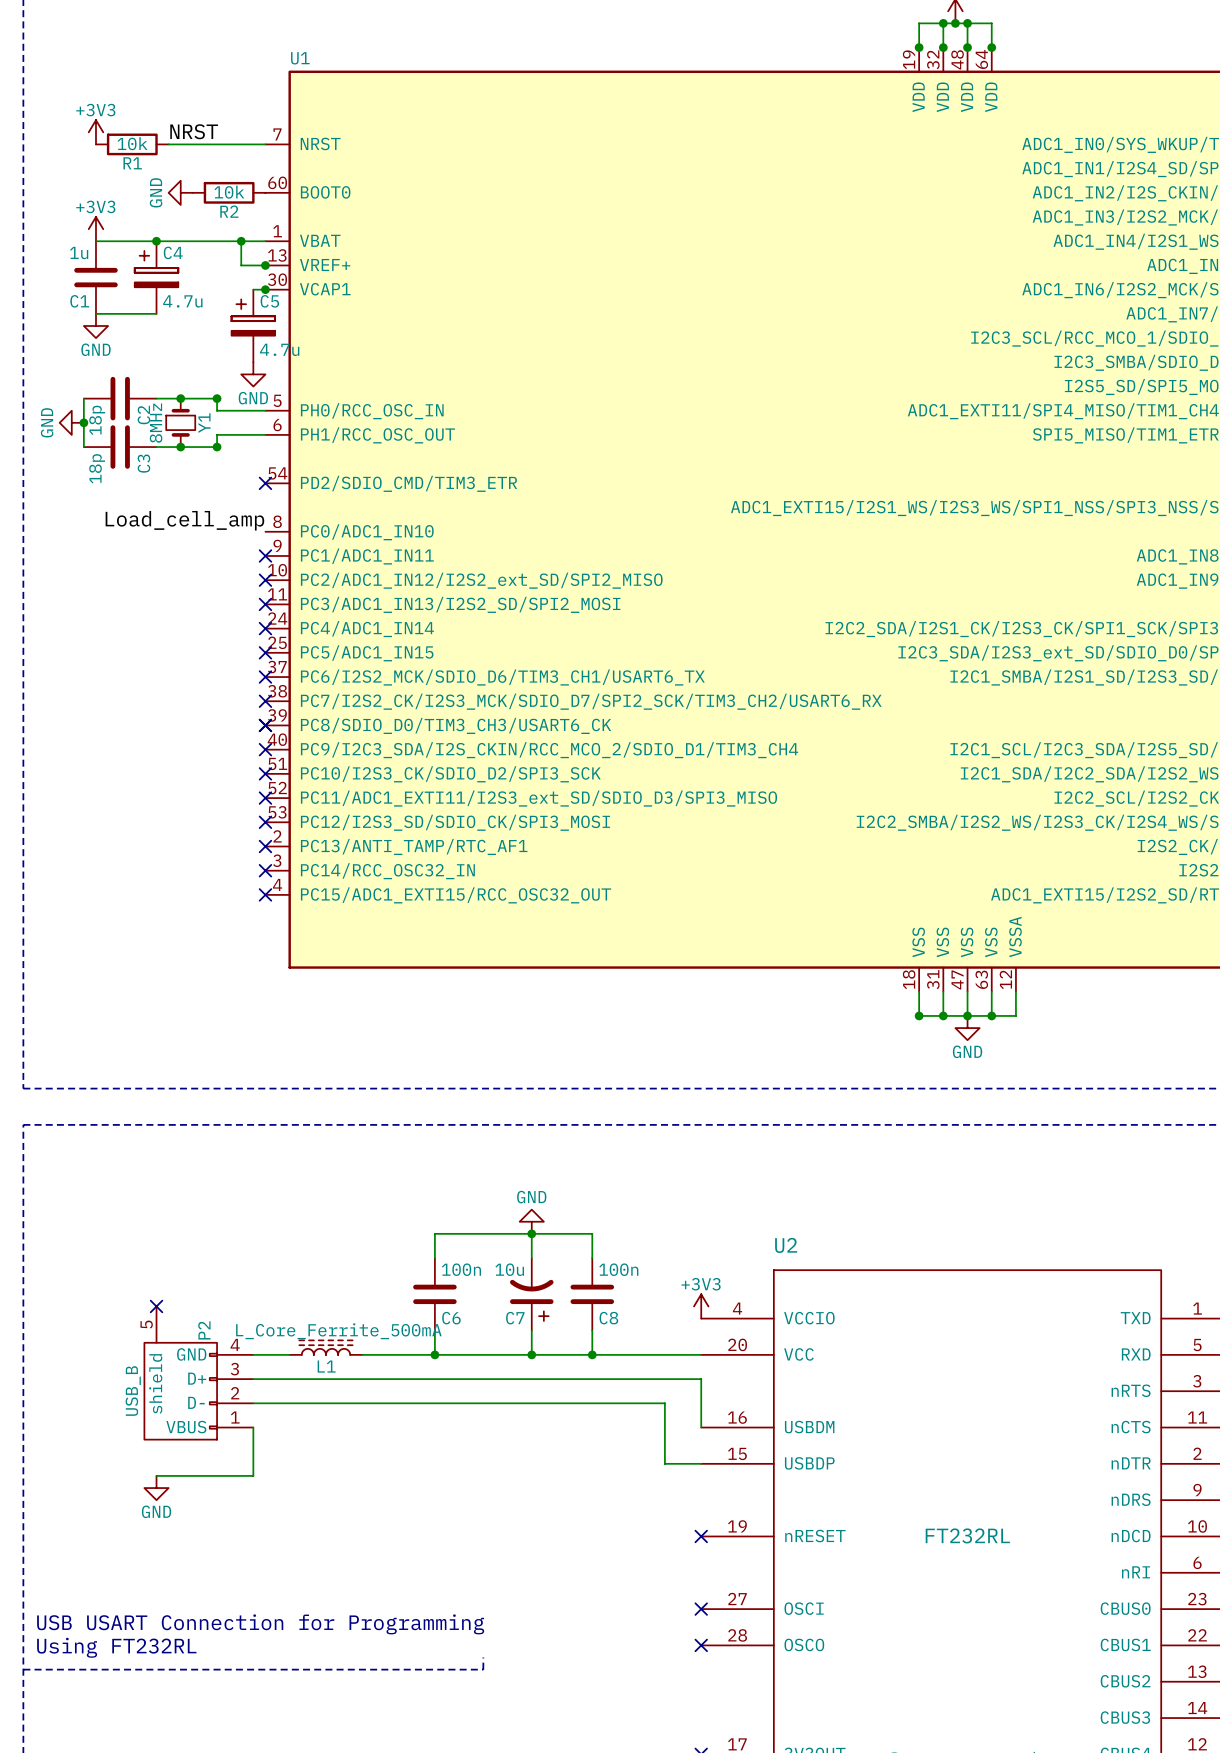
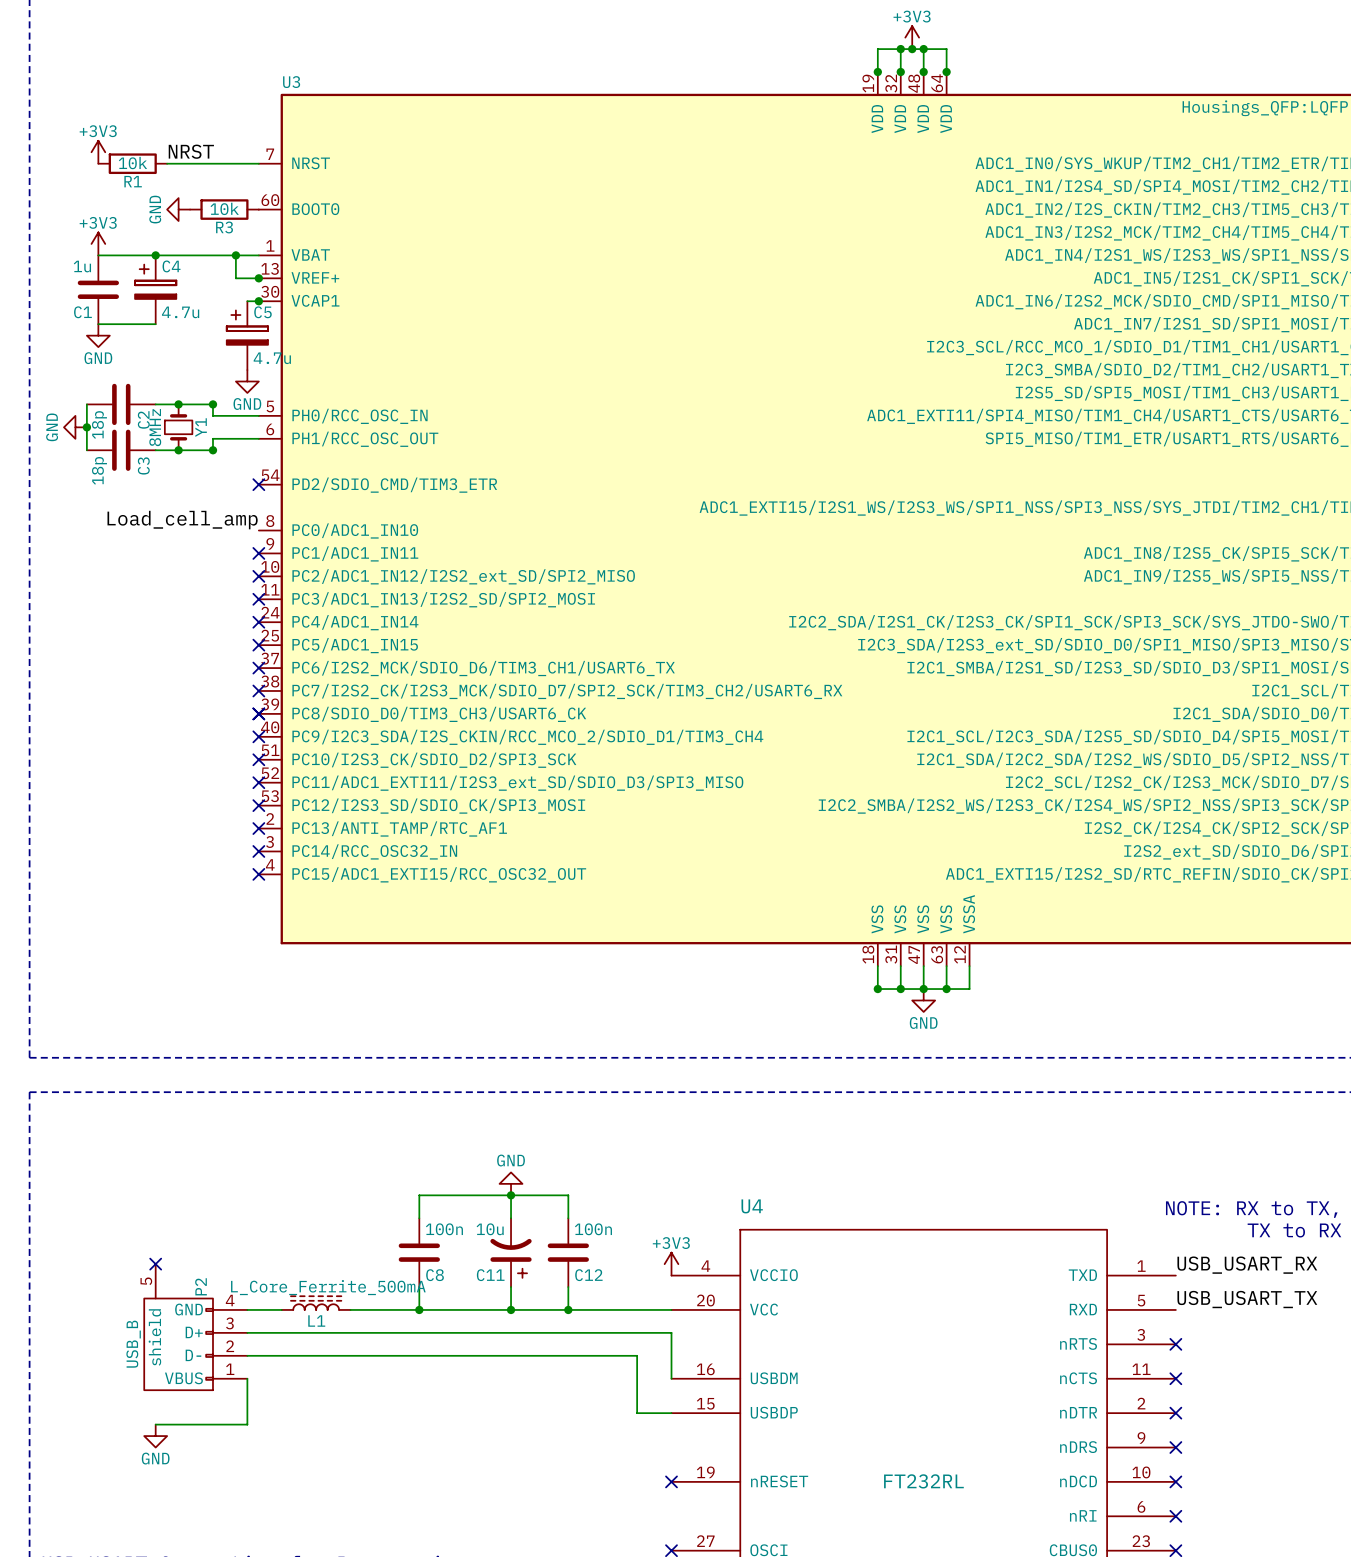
U1 name: U1 (300, 58) -> U3 (291, 82)
R2 name: R2 (229, 211) -> R3 (224, 227)
U2 name: U2 (786, 1245) -> U4 (752, 1206)
C6 name: C6 (451, 1318) -> C8 (435, 1275)
C7 name: C7 (515, 1318) -> C11 (490, 1275)
C8 name: C8 (608, 1318) -> C12 (588, 1275)

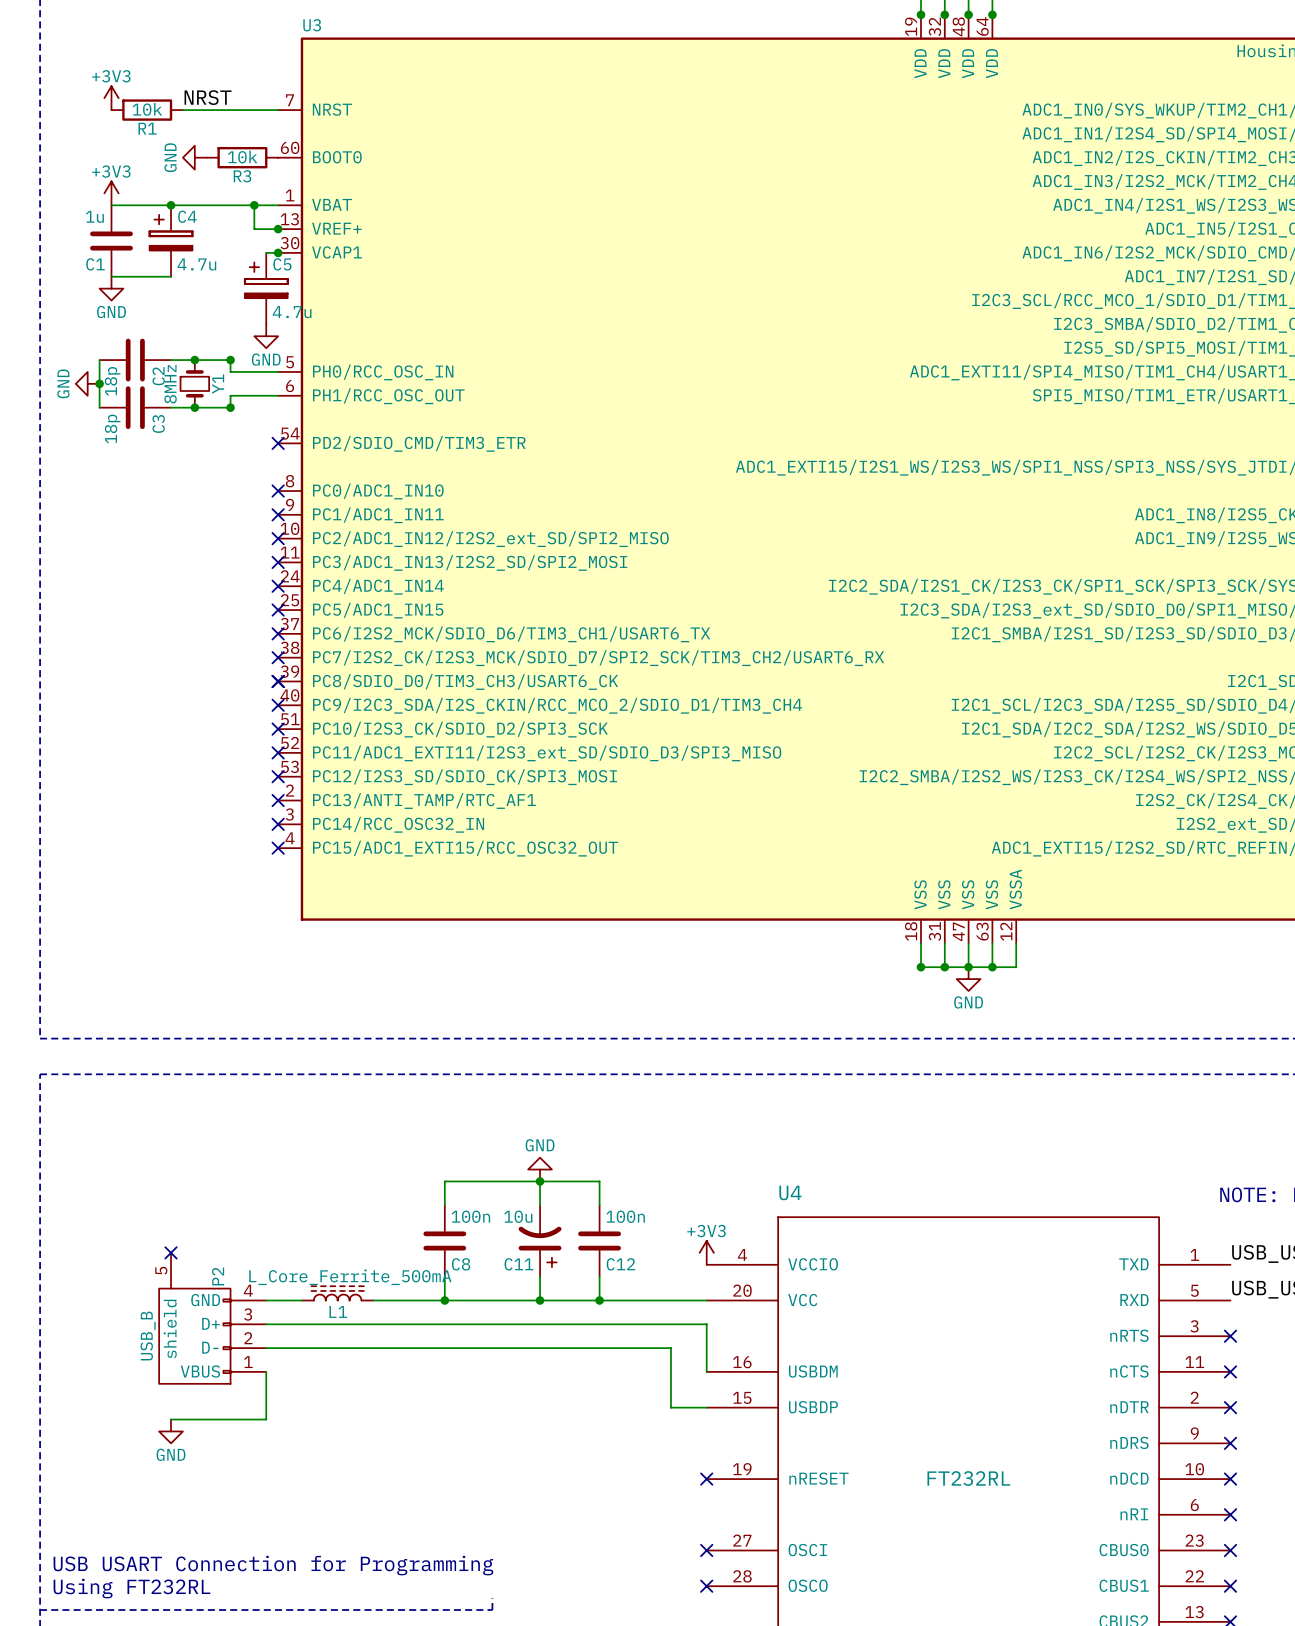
label: Load_cell_amp (182, 520) -> none
no-connect mark: none -> (278, 491)

